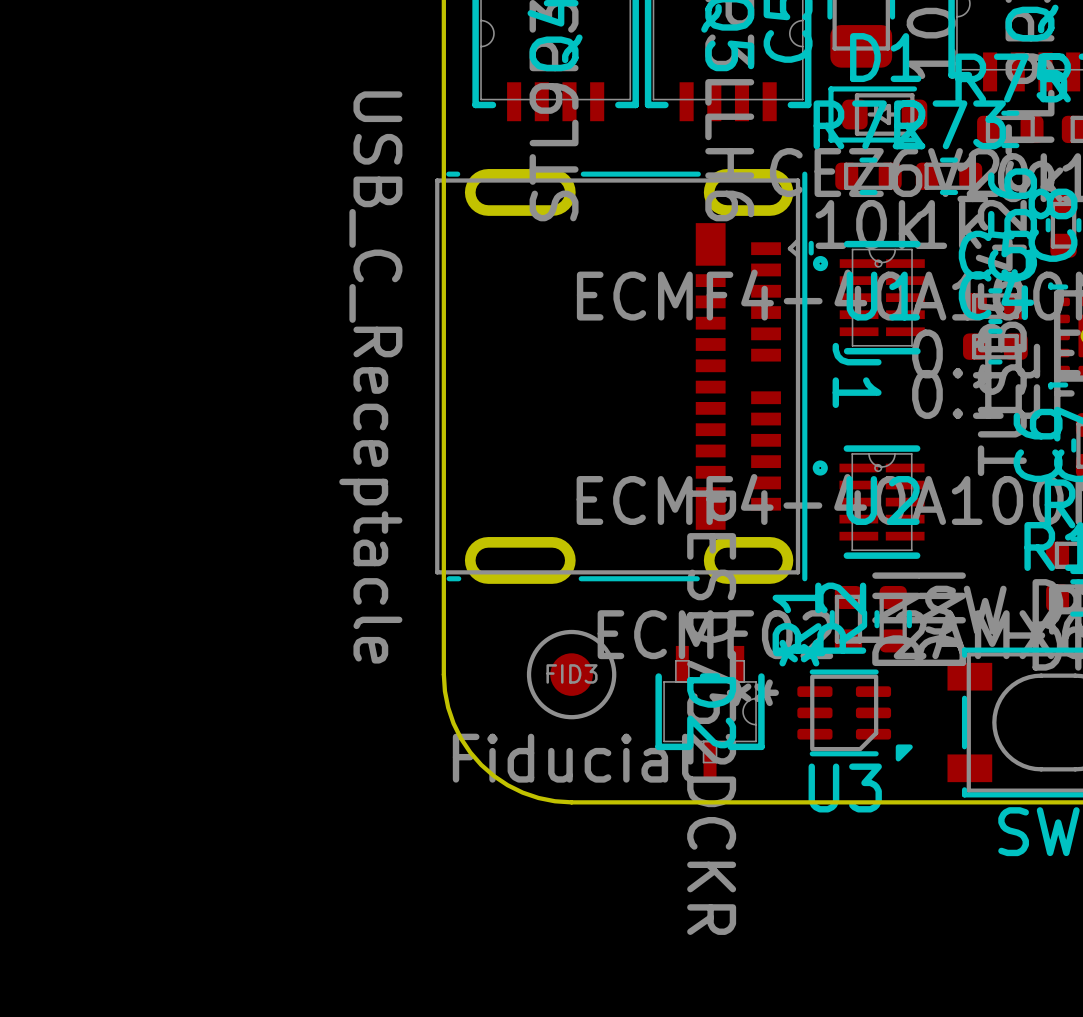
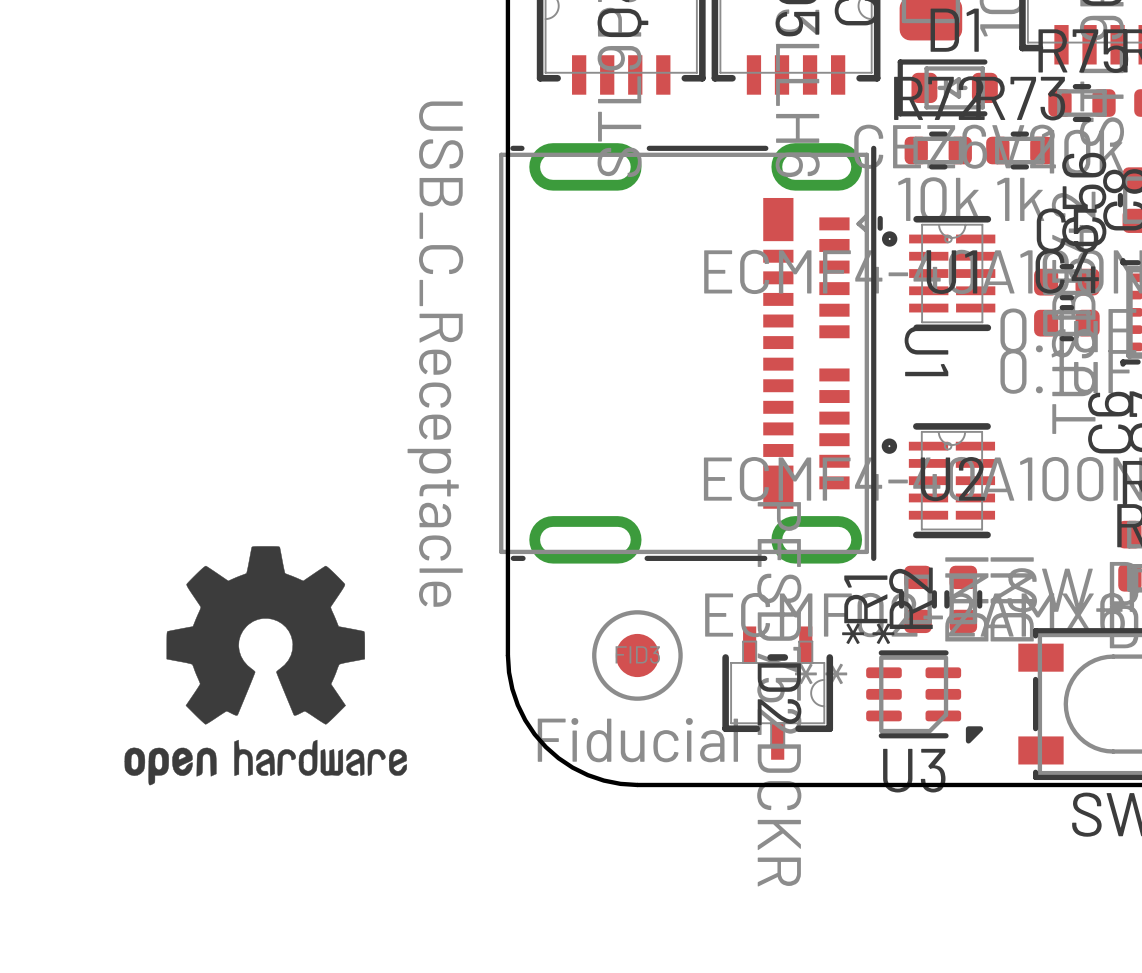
drawing: none -> [124, 546, 407, 786]

